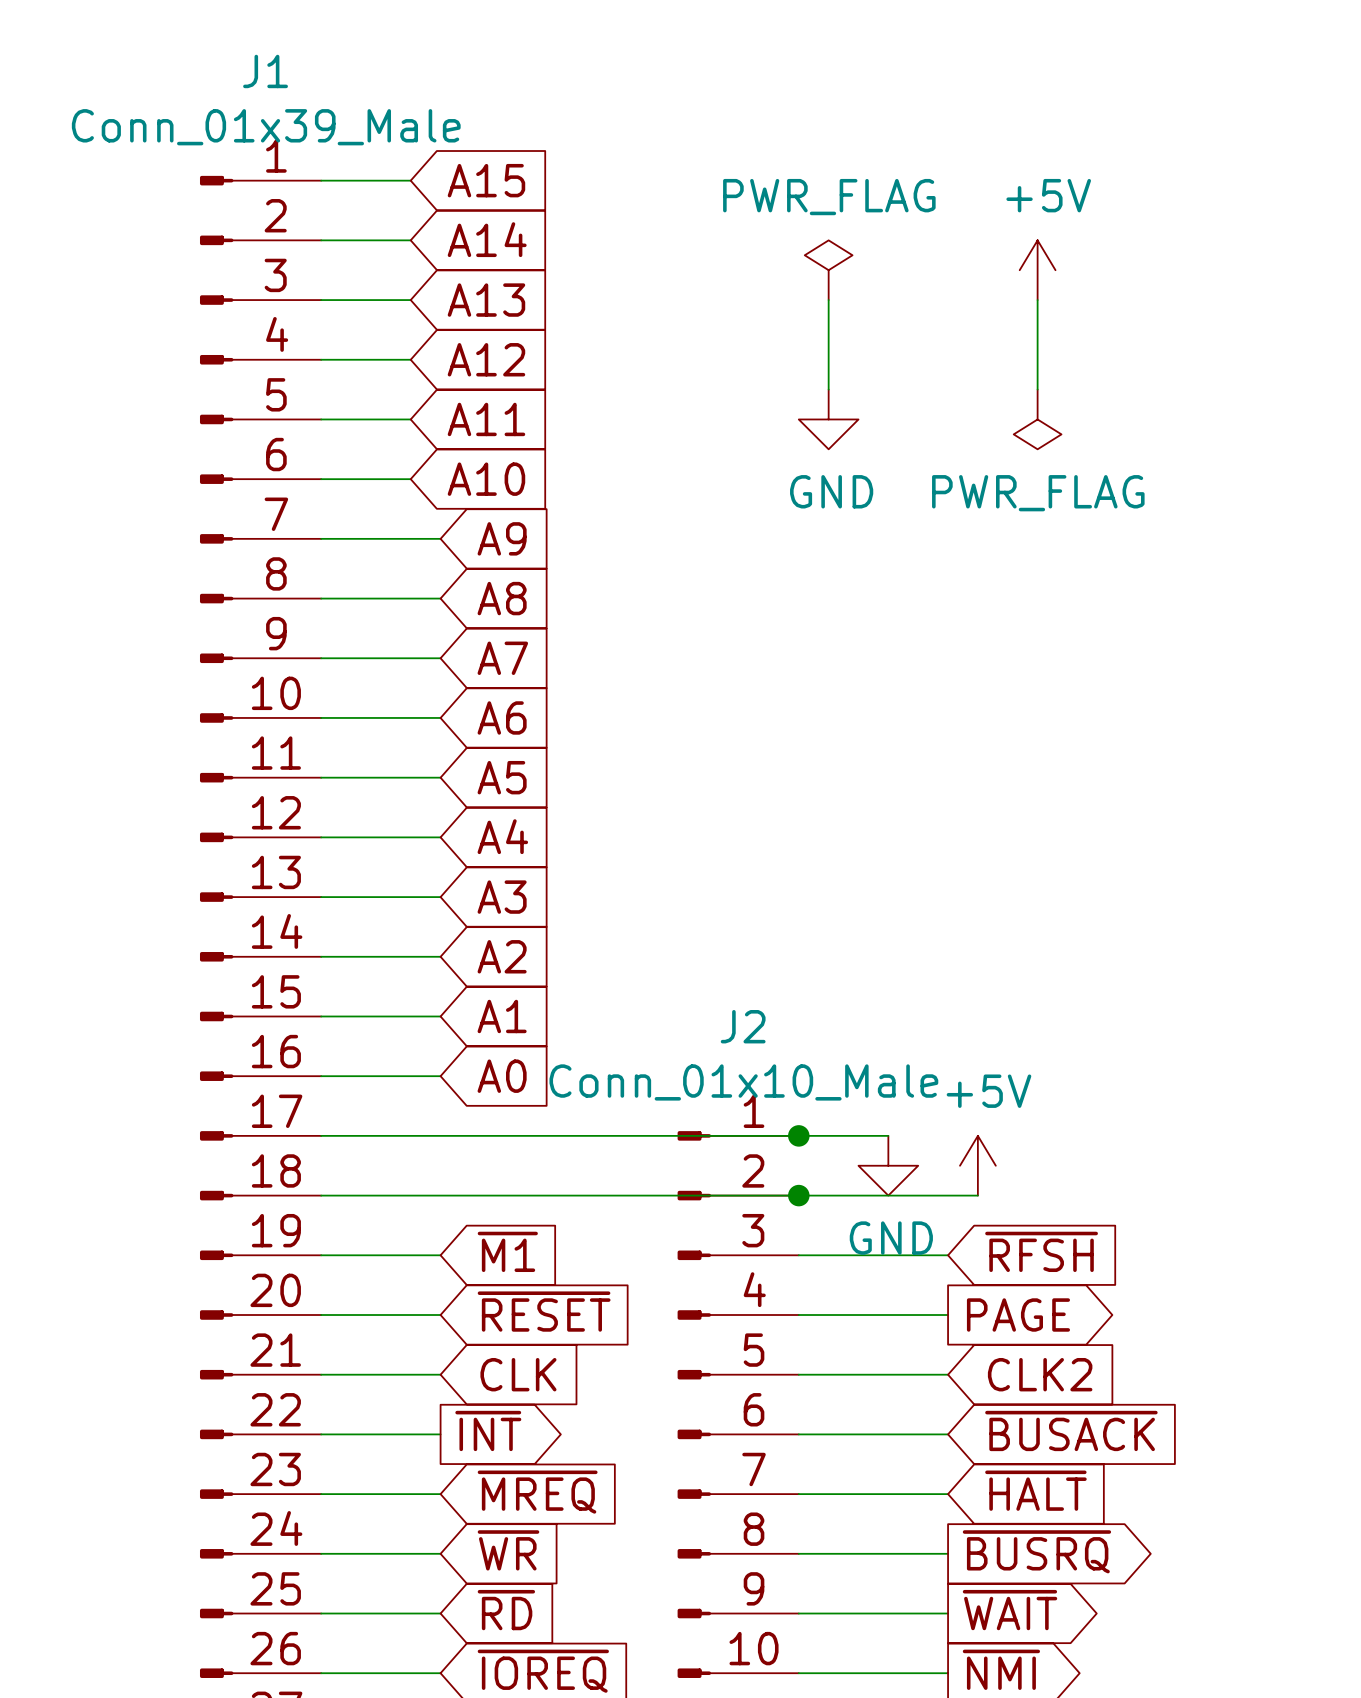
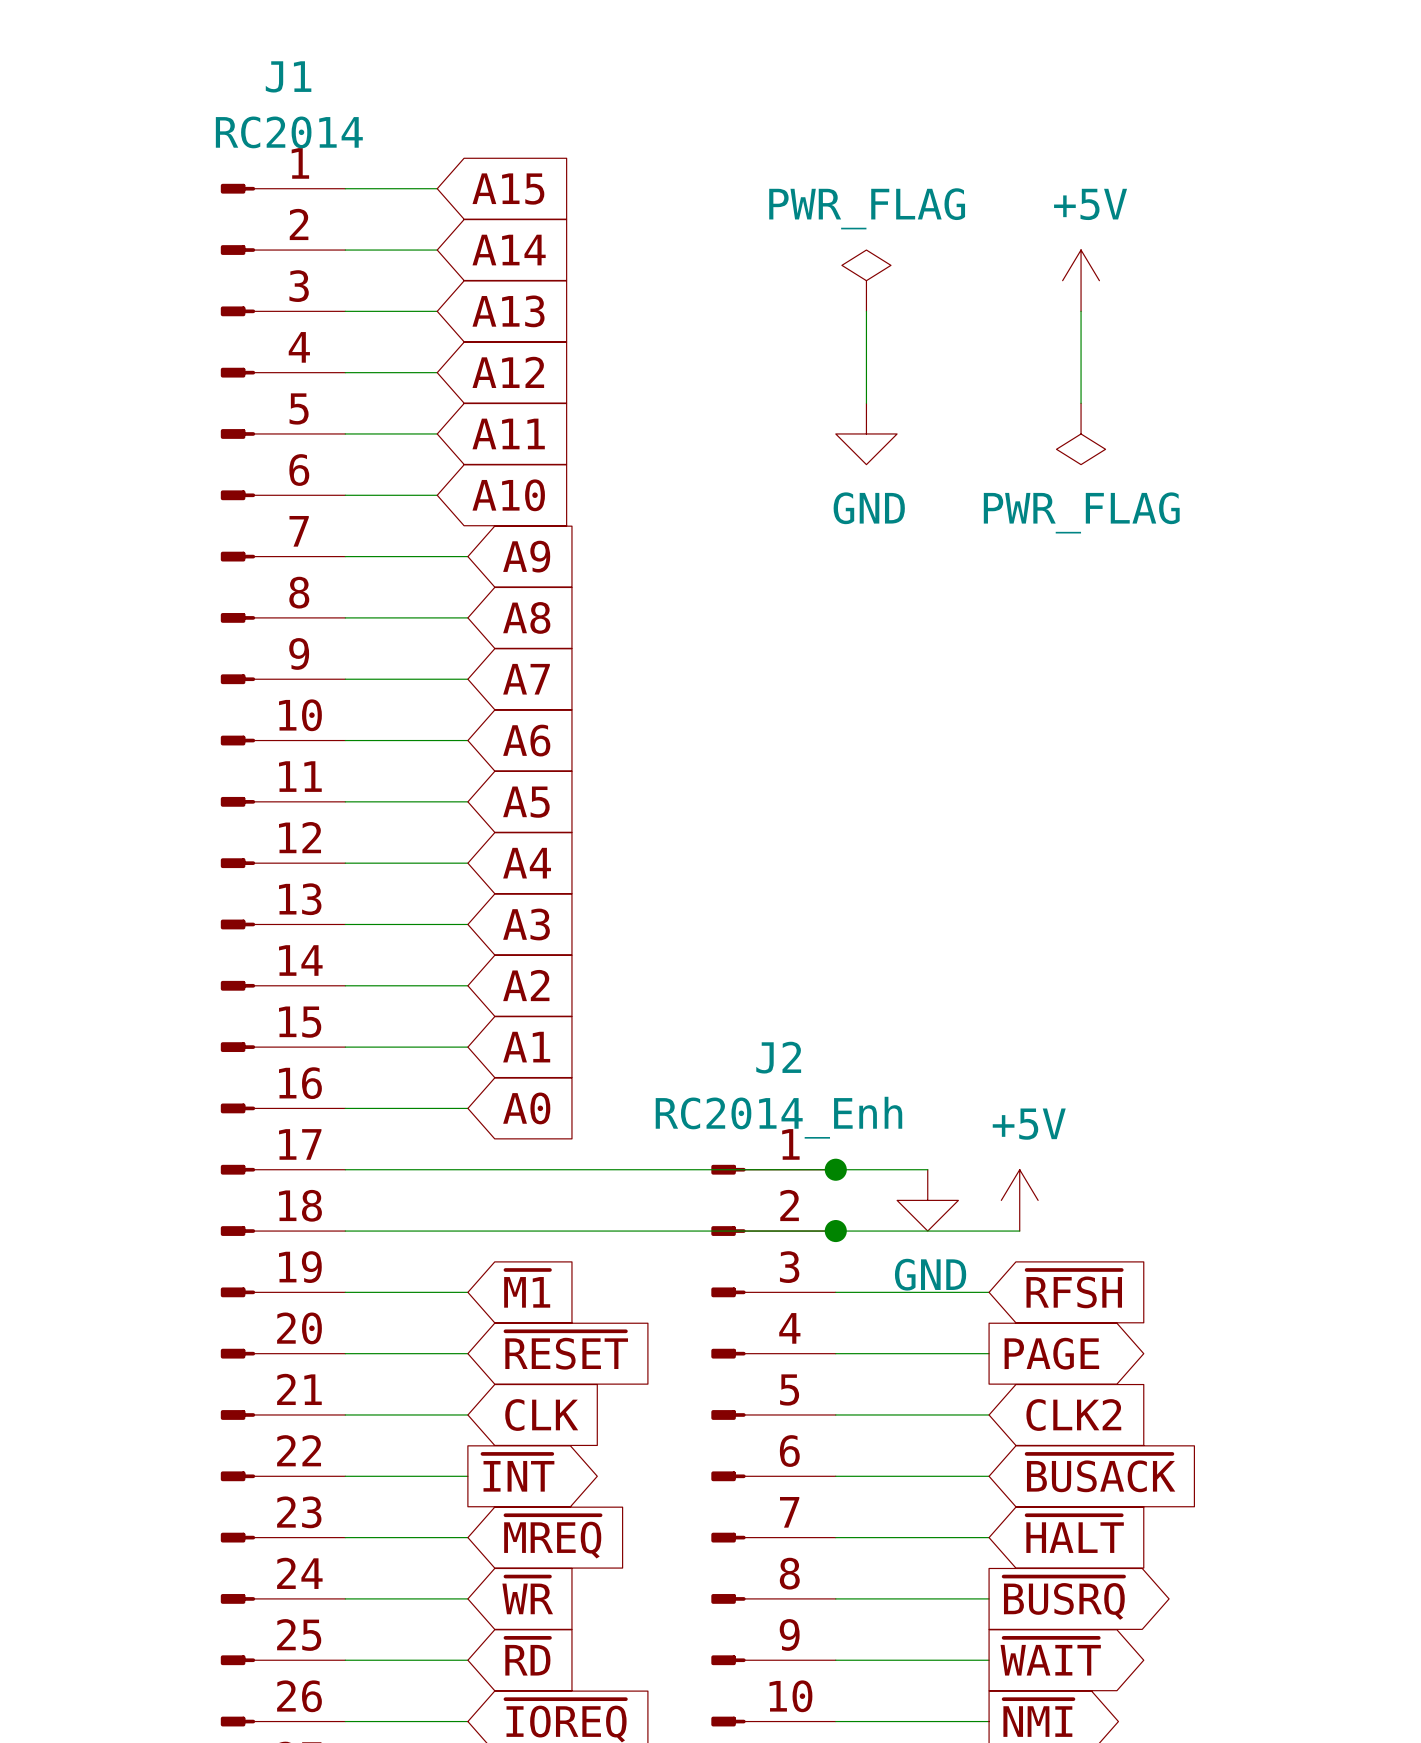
J1 value: Conn_01x39_Male (266, 127) -> RC2014 (289, 132)
J2 value: Conn_01x10_Male (743, 1082) -> RC2014_Enh (778, 1117)

